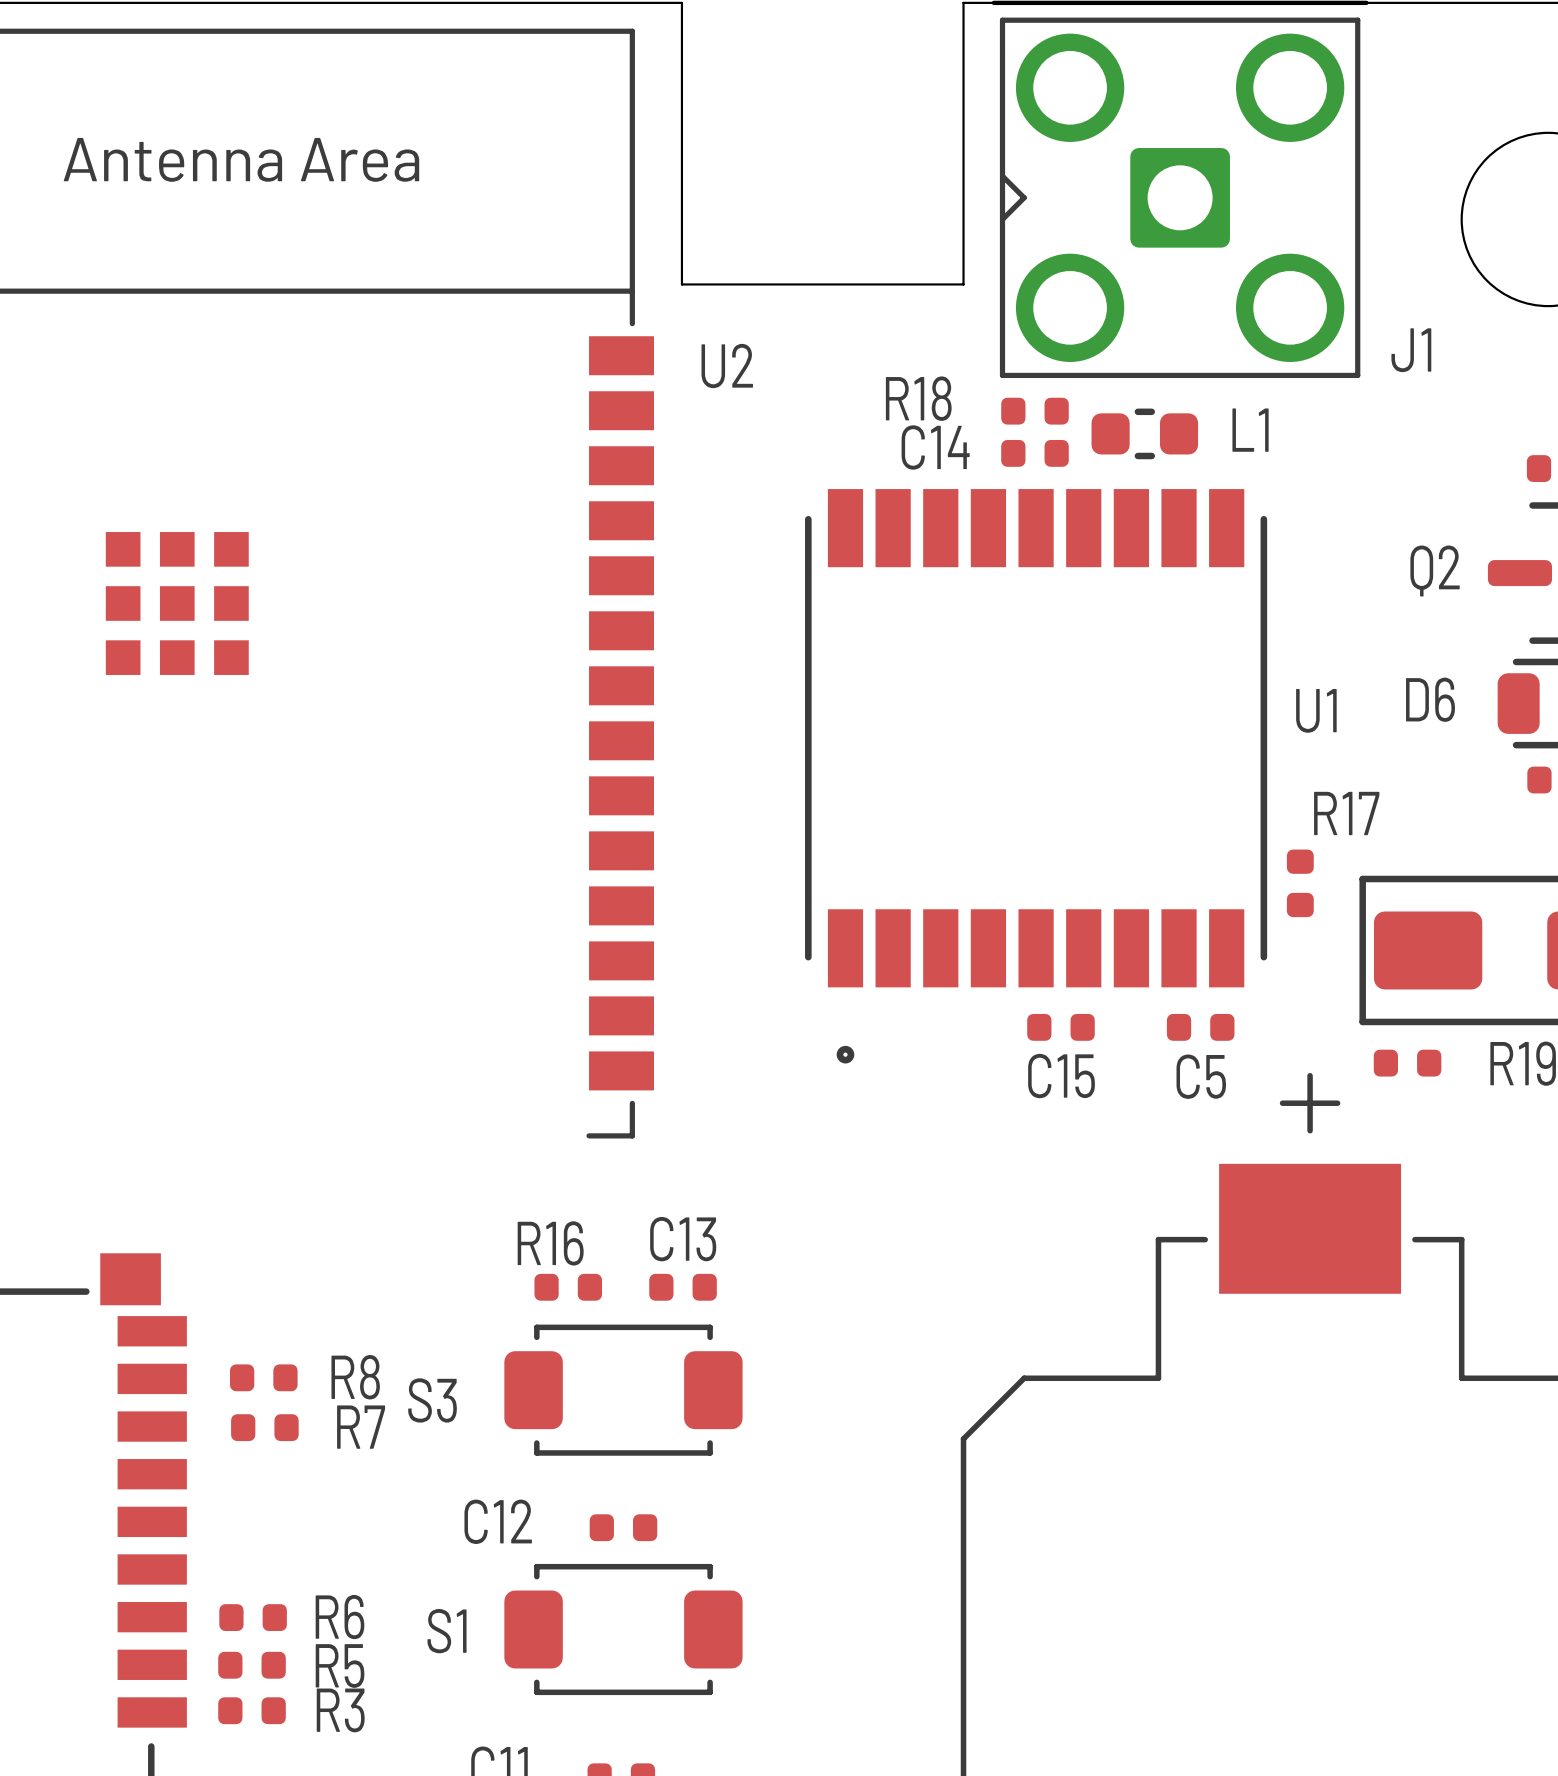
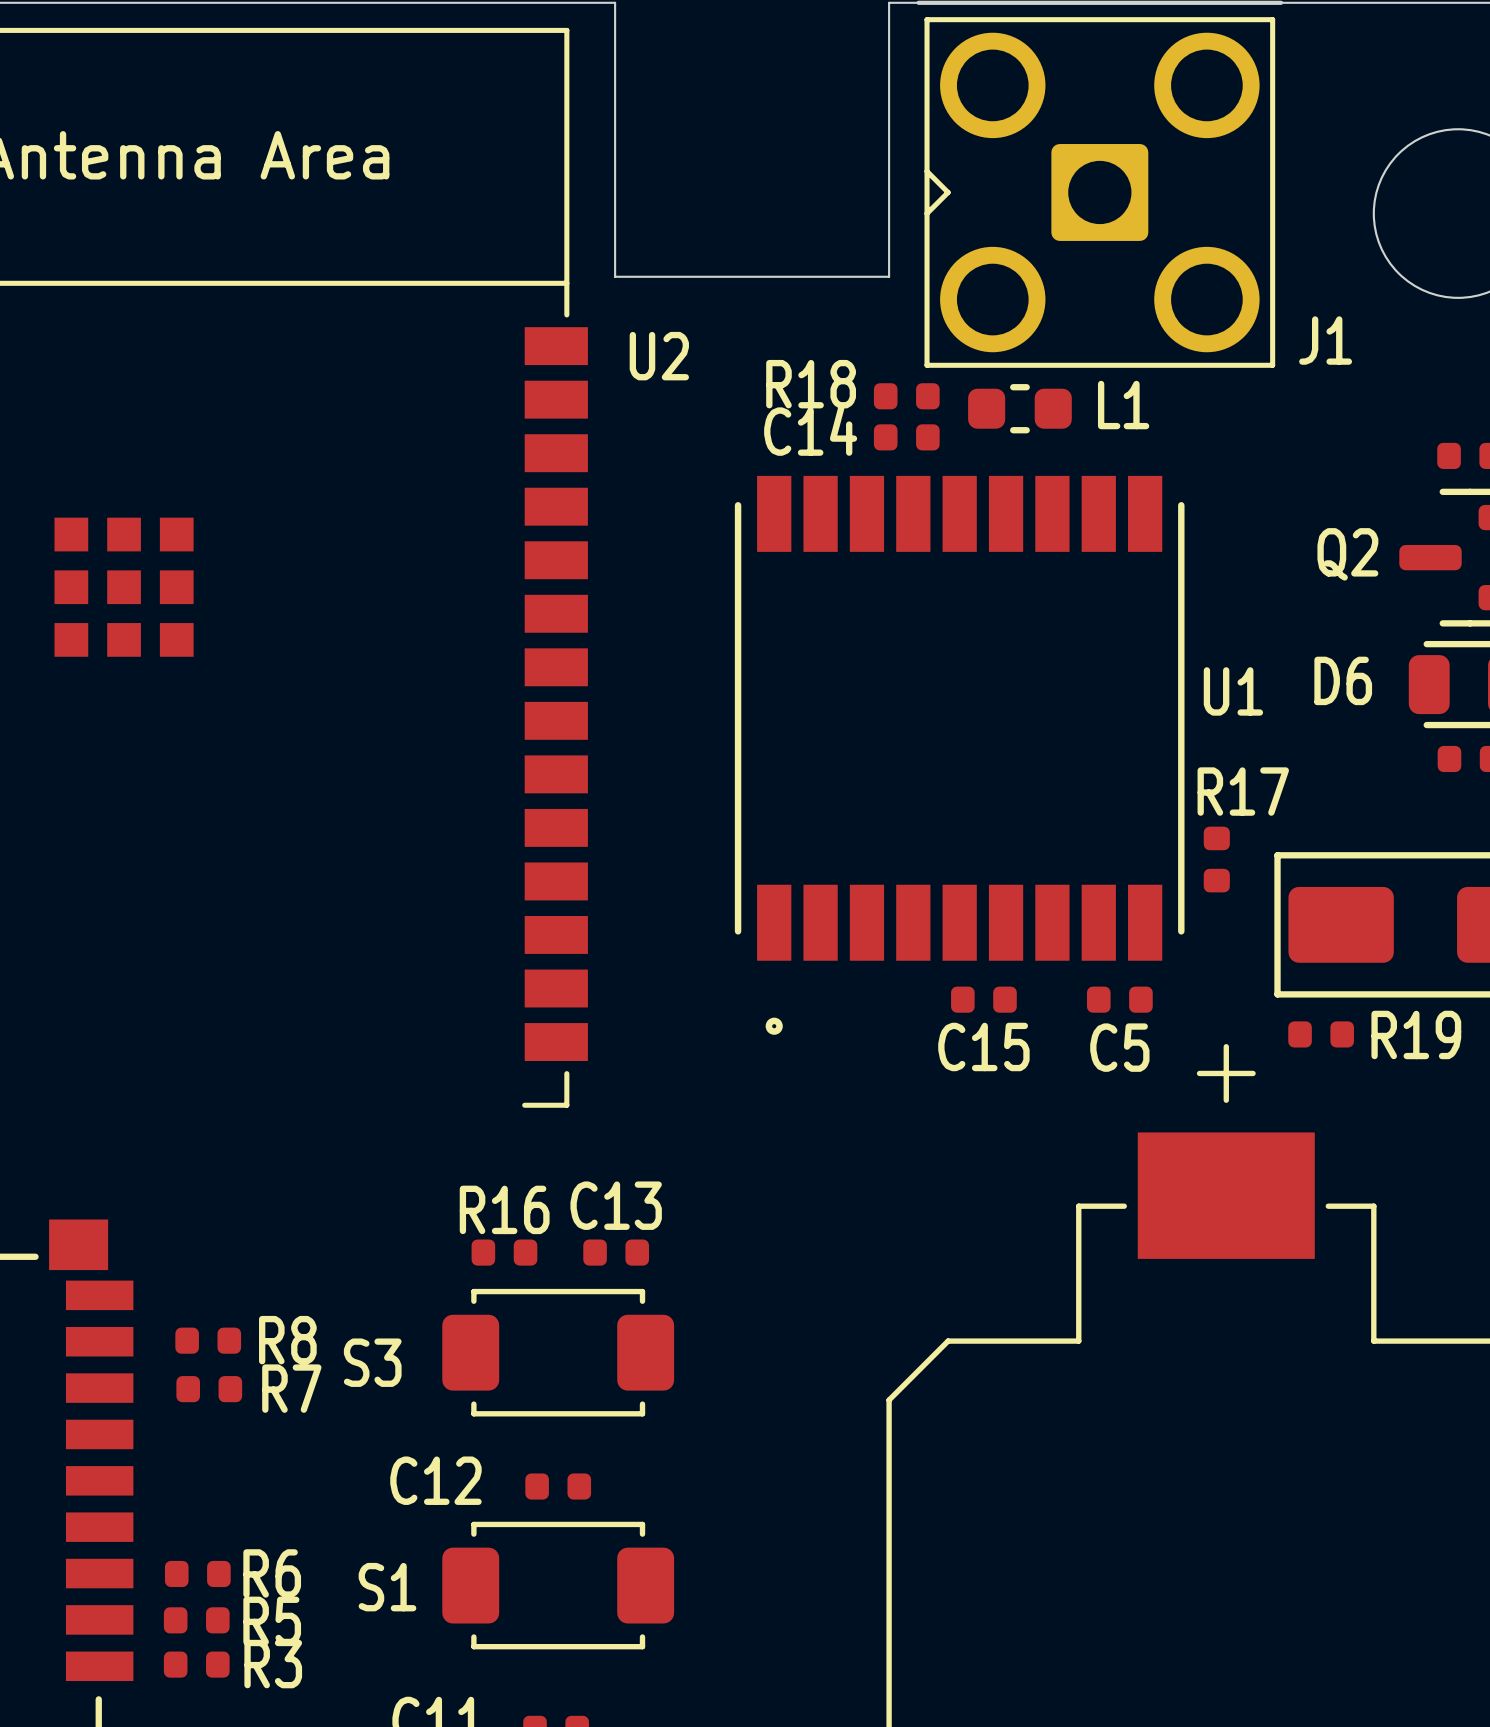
R18 position: (1035, 411) -> (906, 396)
L1 position: (1144, 433) -> (1019, 408)
C14 position: (1035, 453) -> (906, 437)

